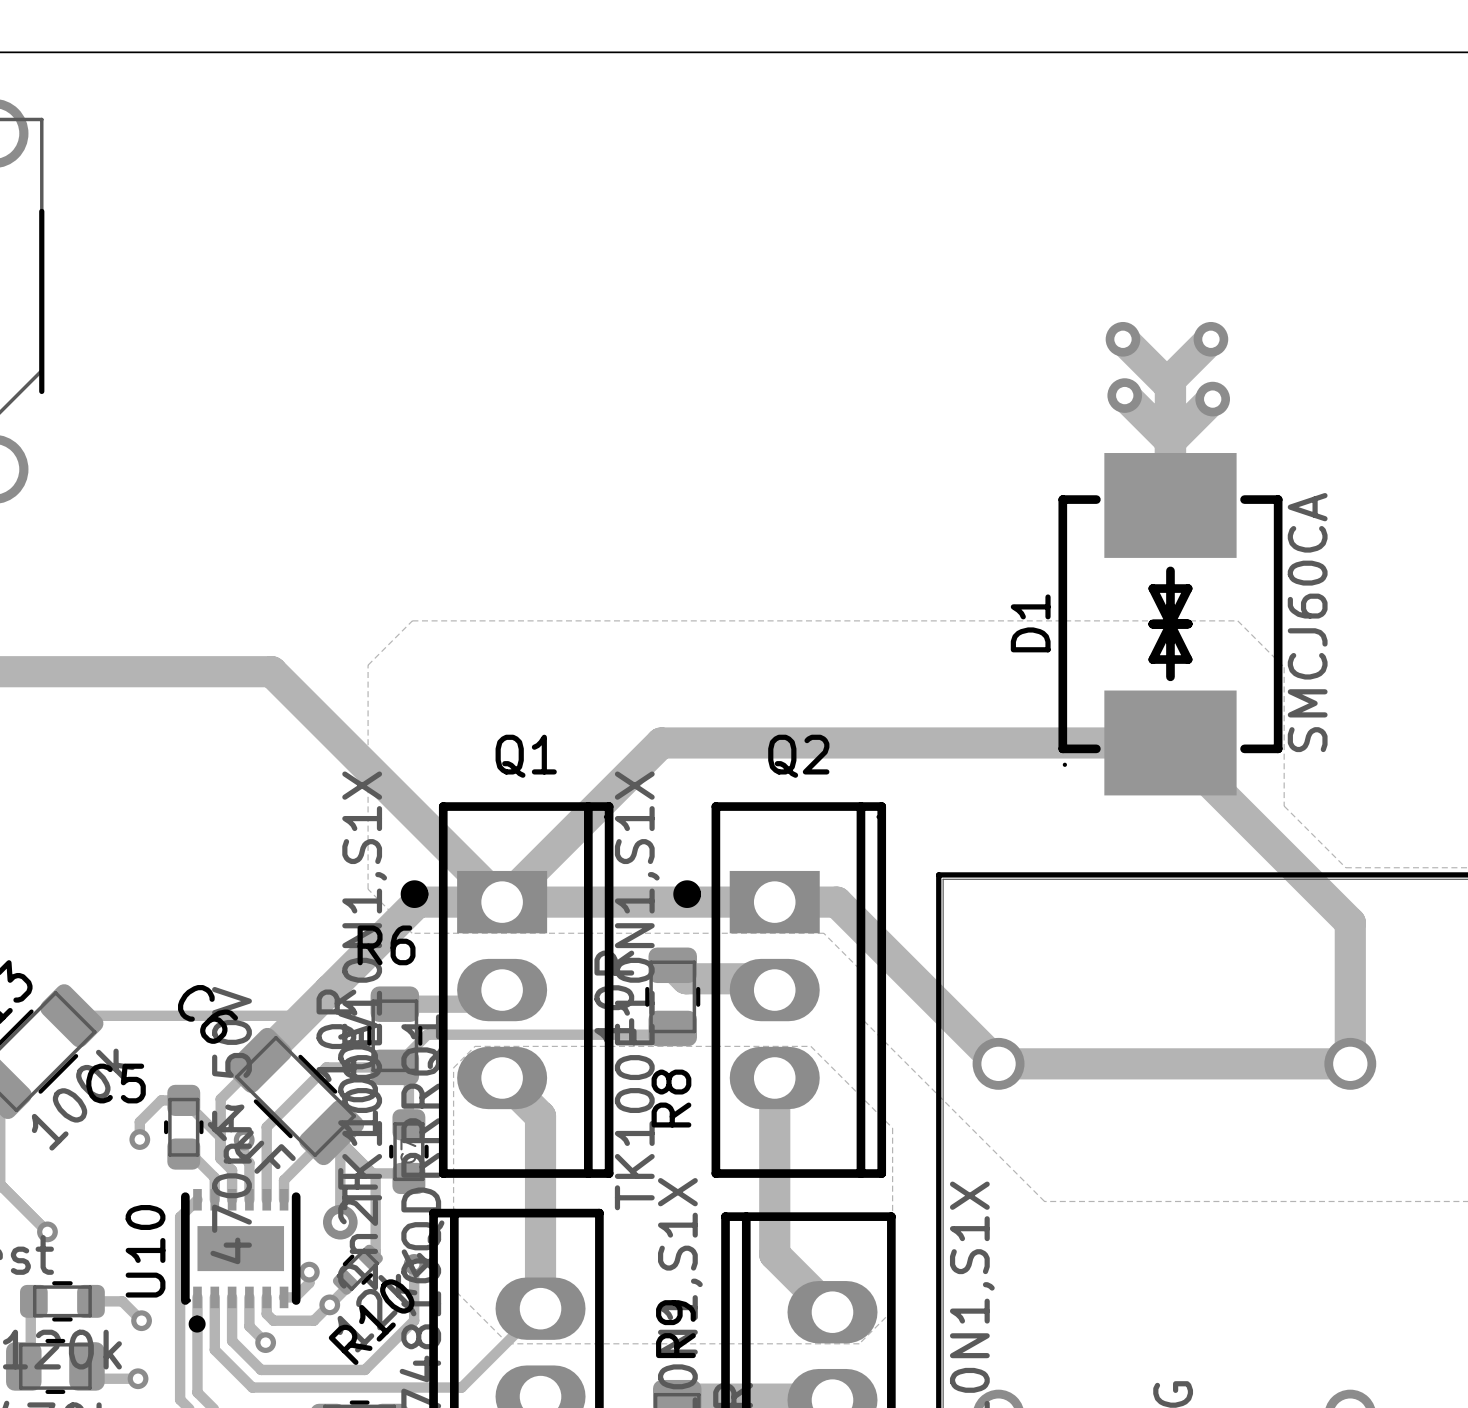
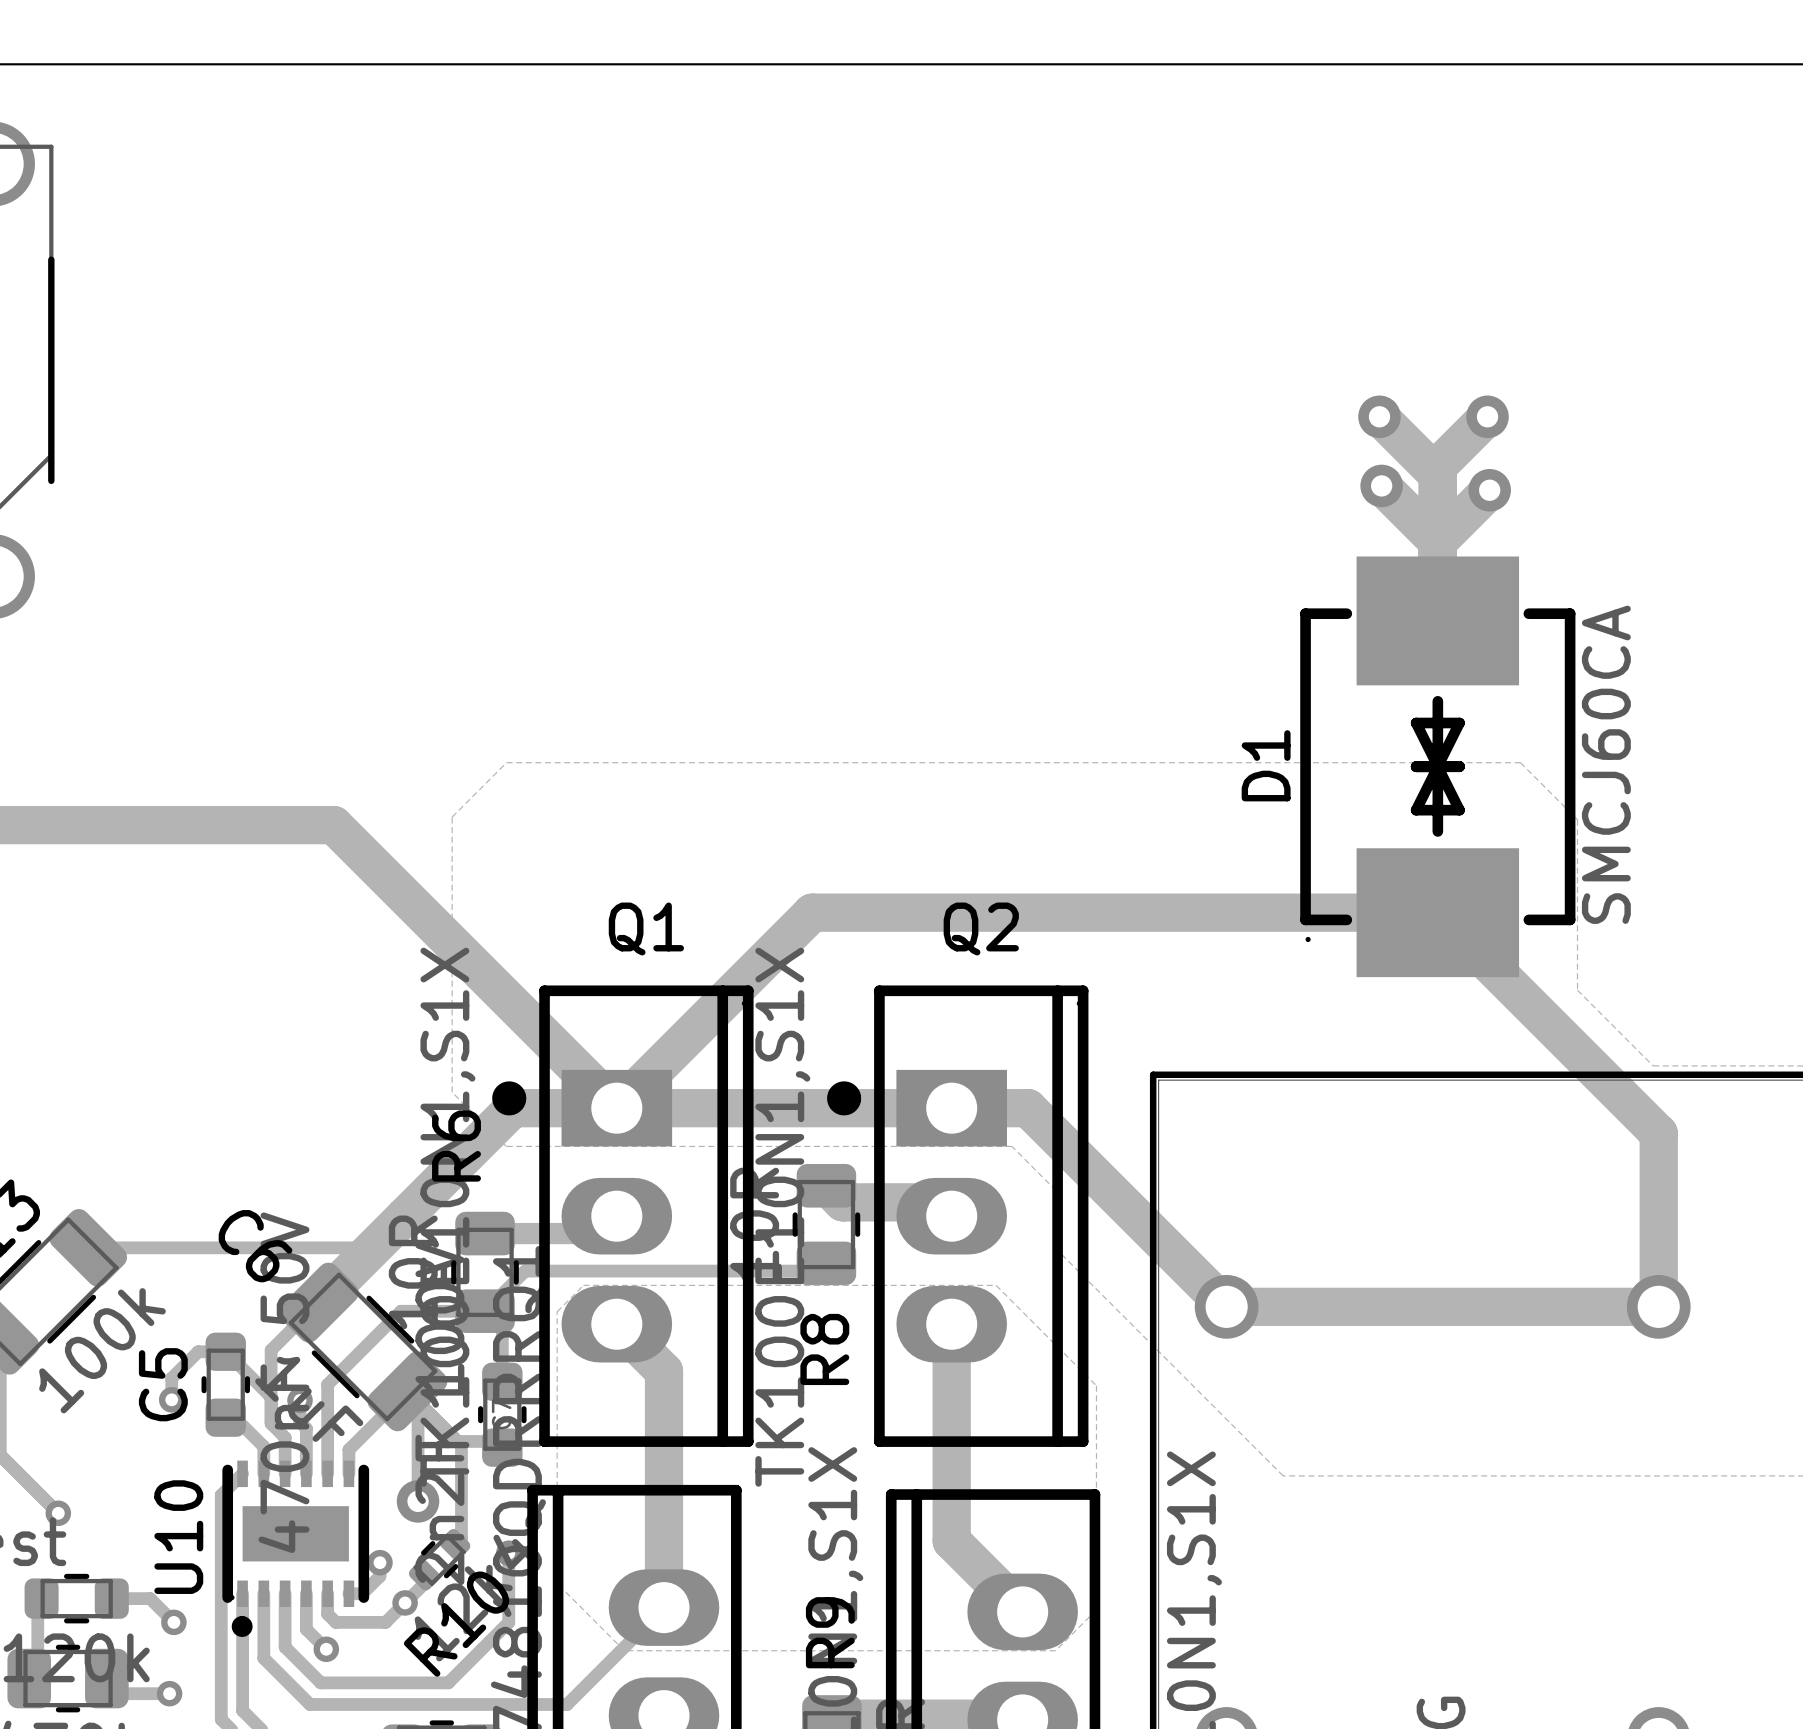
R6 name rotation: 0° (386, 945) -> 90° counterclockwise (456, 1146)
C5 name rotation: 0° (116, 1083) -> 90° counterclockwise (163, 1384)

